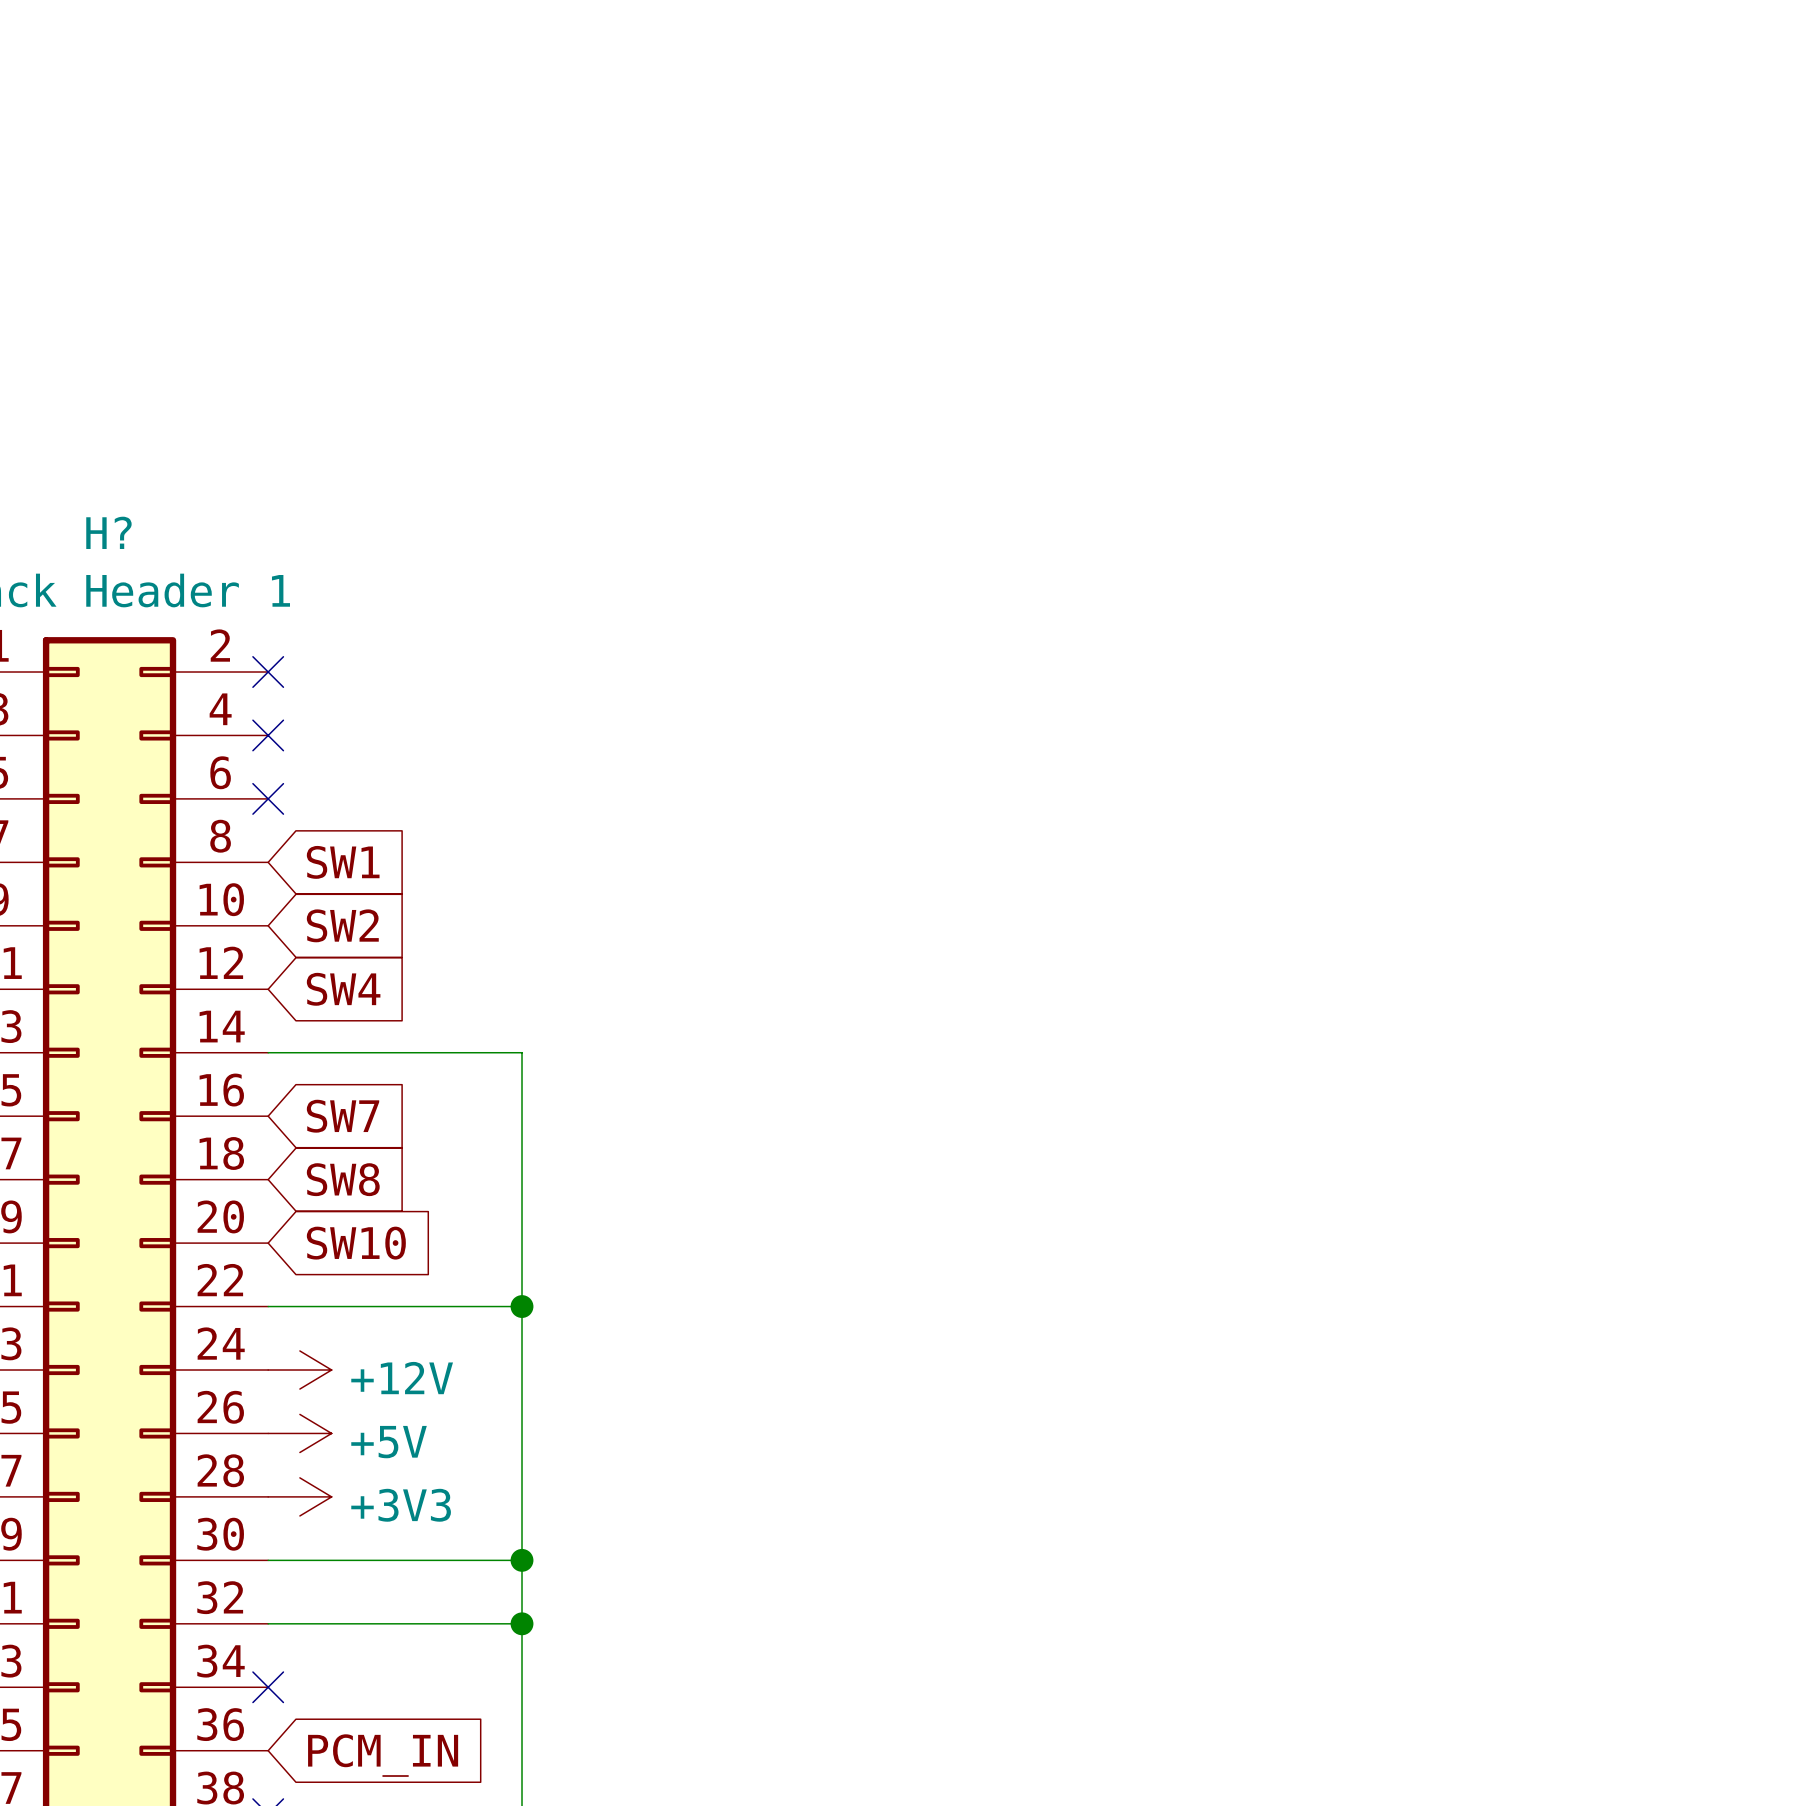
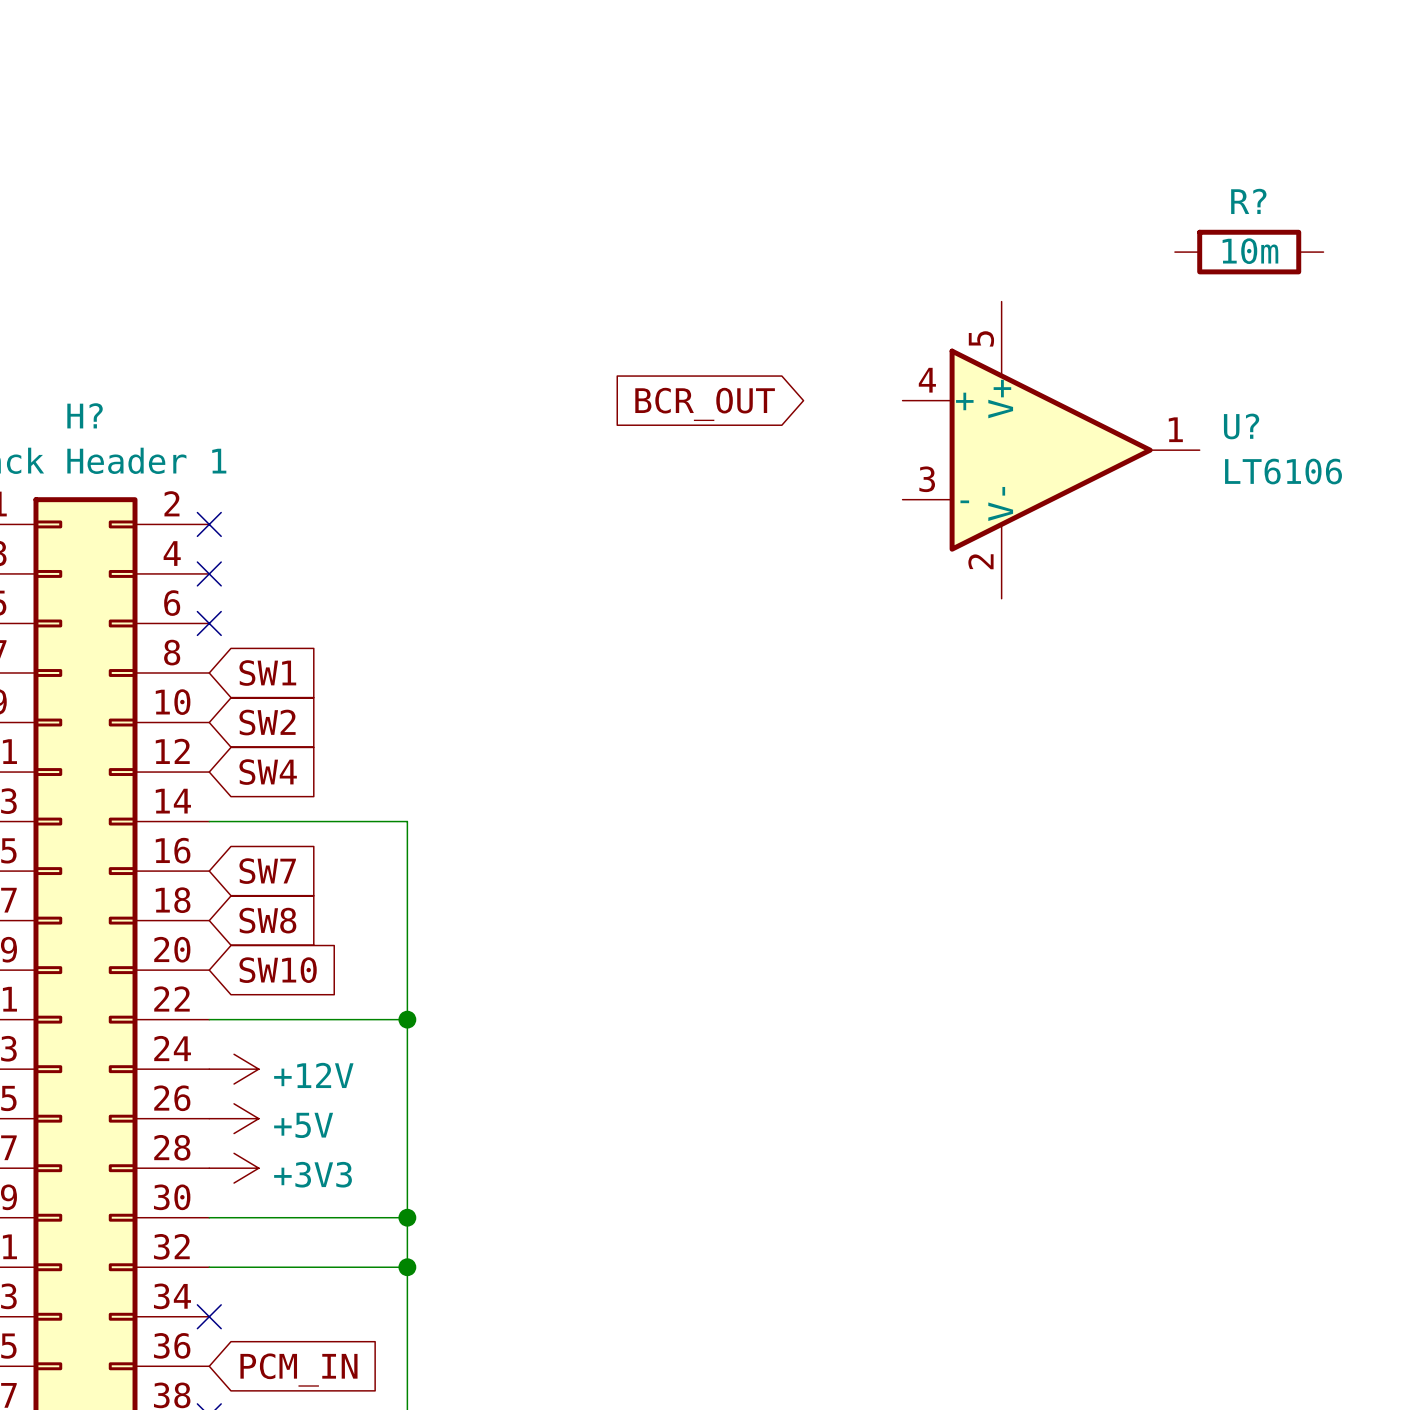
R?: none -> 10m (1249, 252)
global label: none -> BCR_OUT (705, 404)
U?: none -> LT6106 (1051, 450)

